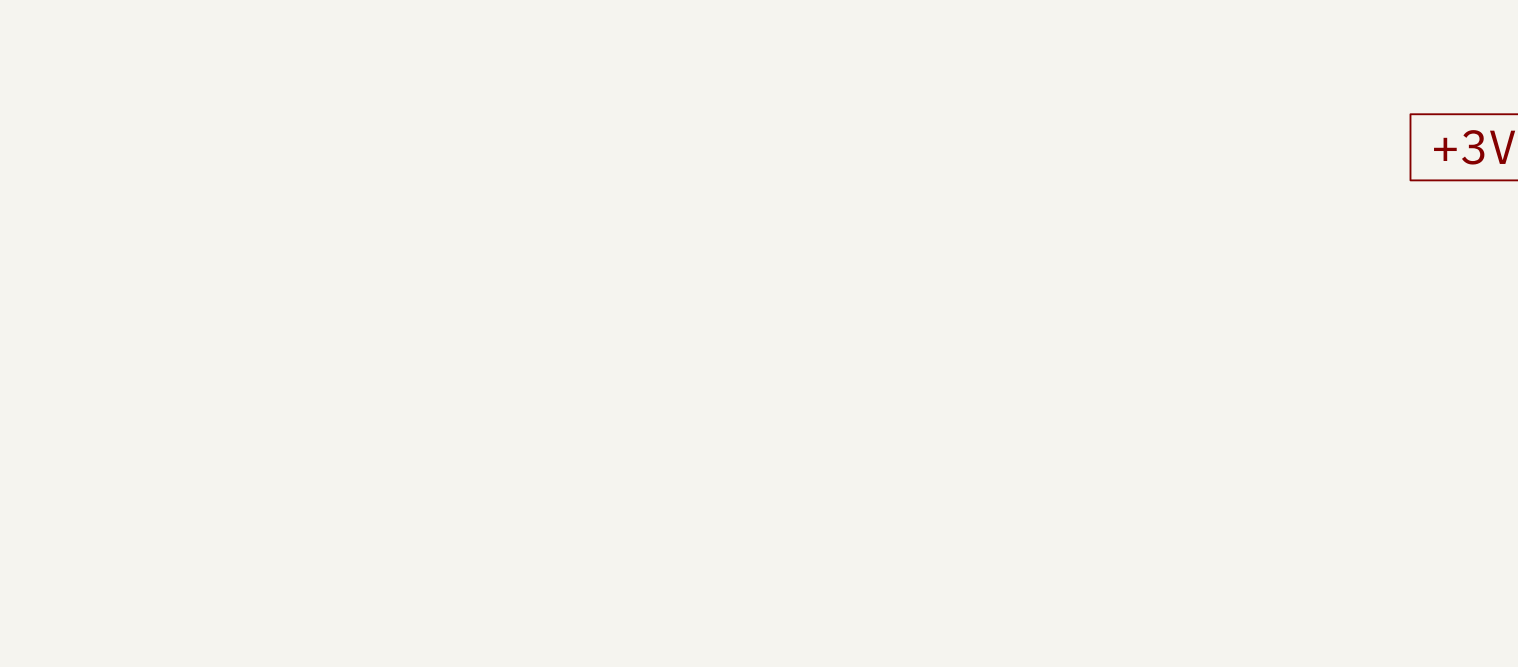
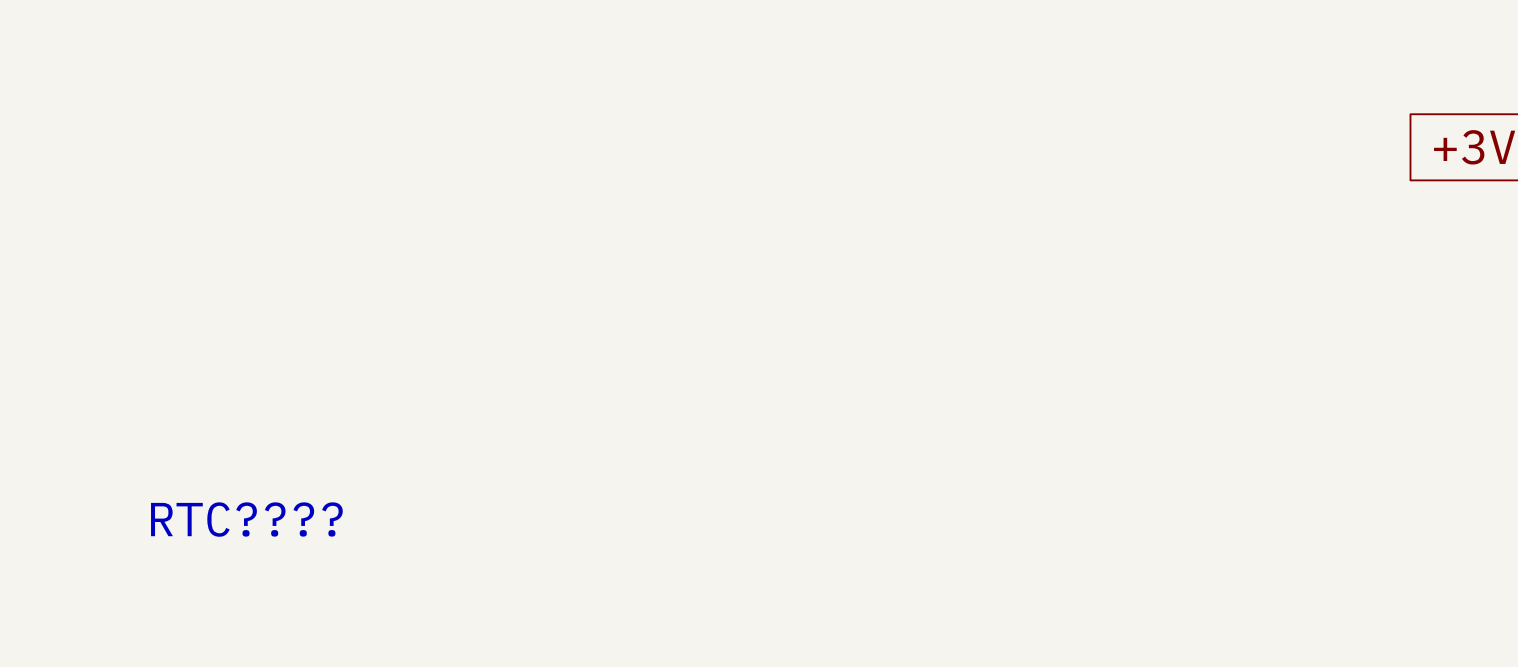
text: none -> RTC???? (246, 519)

